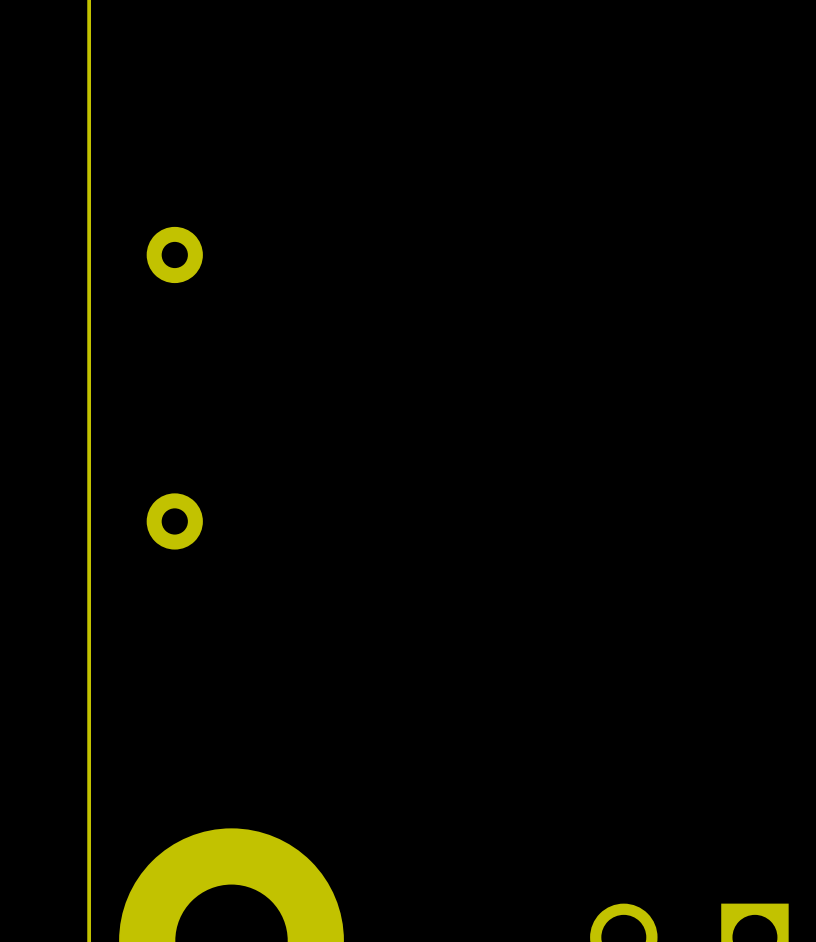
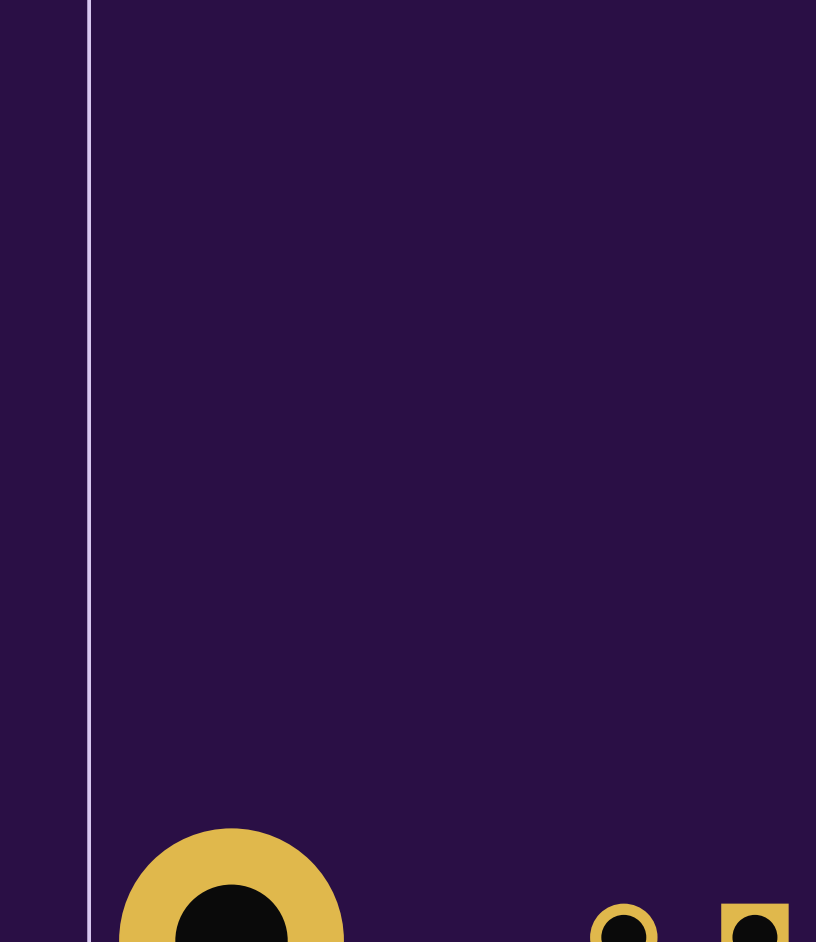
part: (174, 254) -> none
part: (174, 521) -> none

